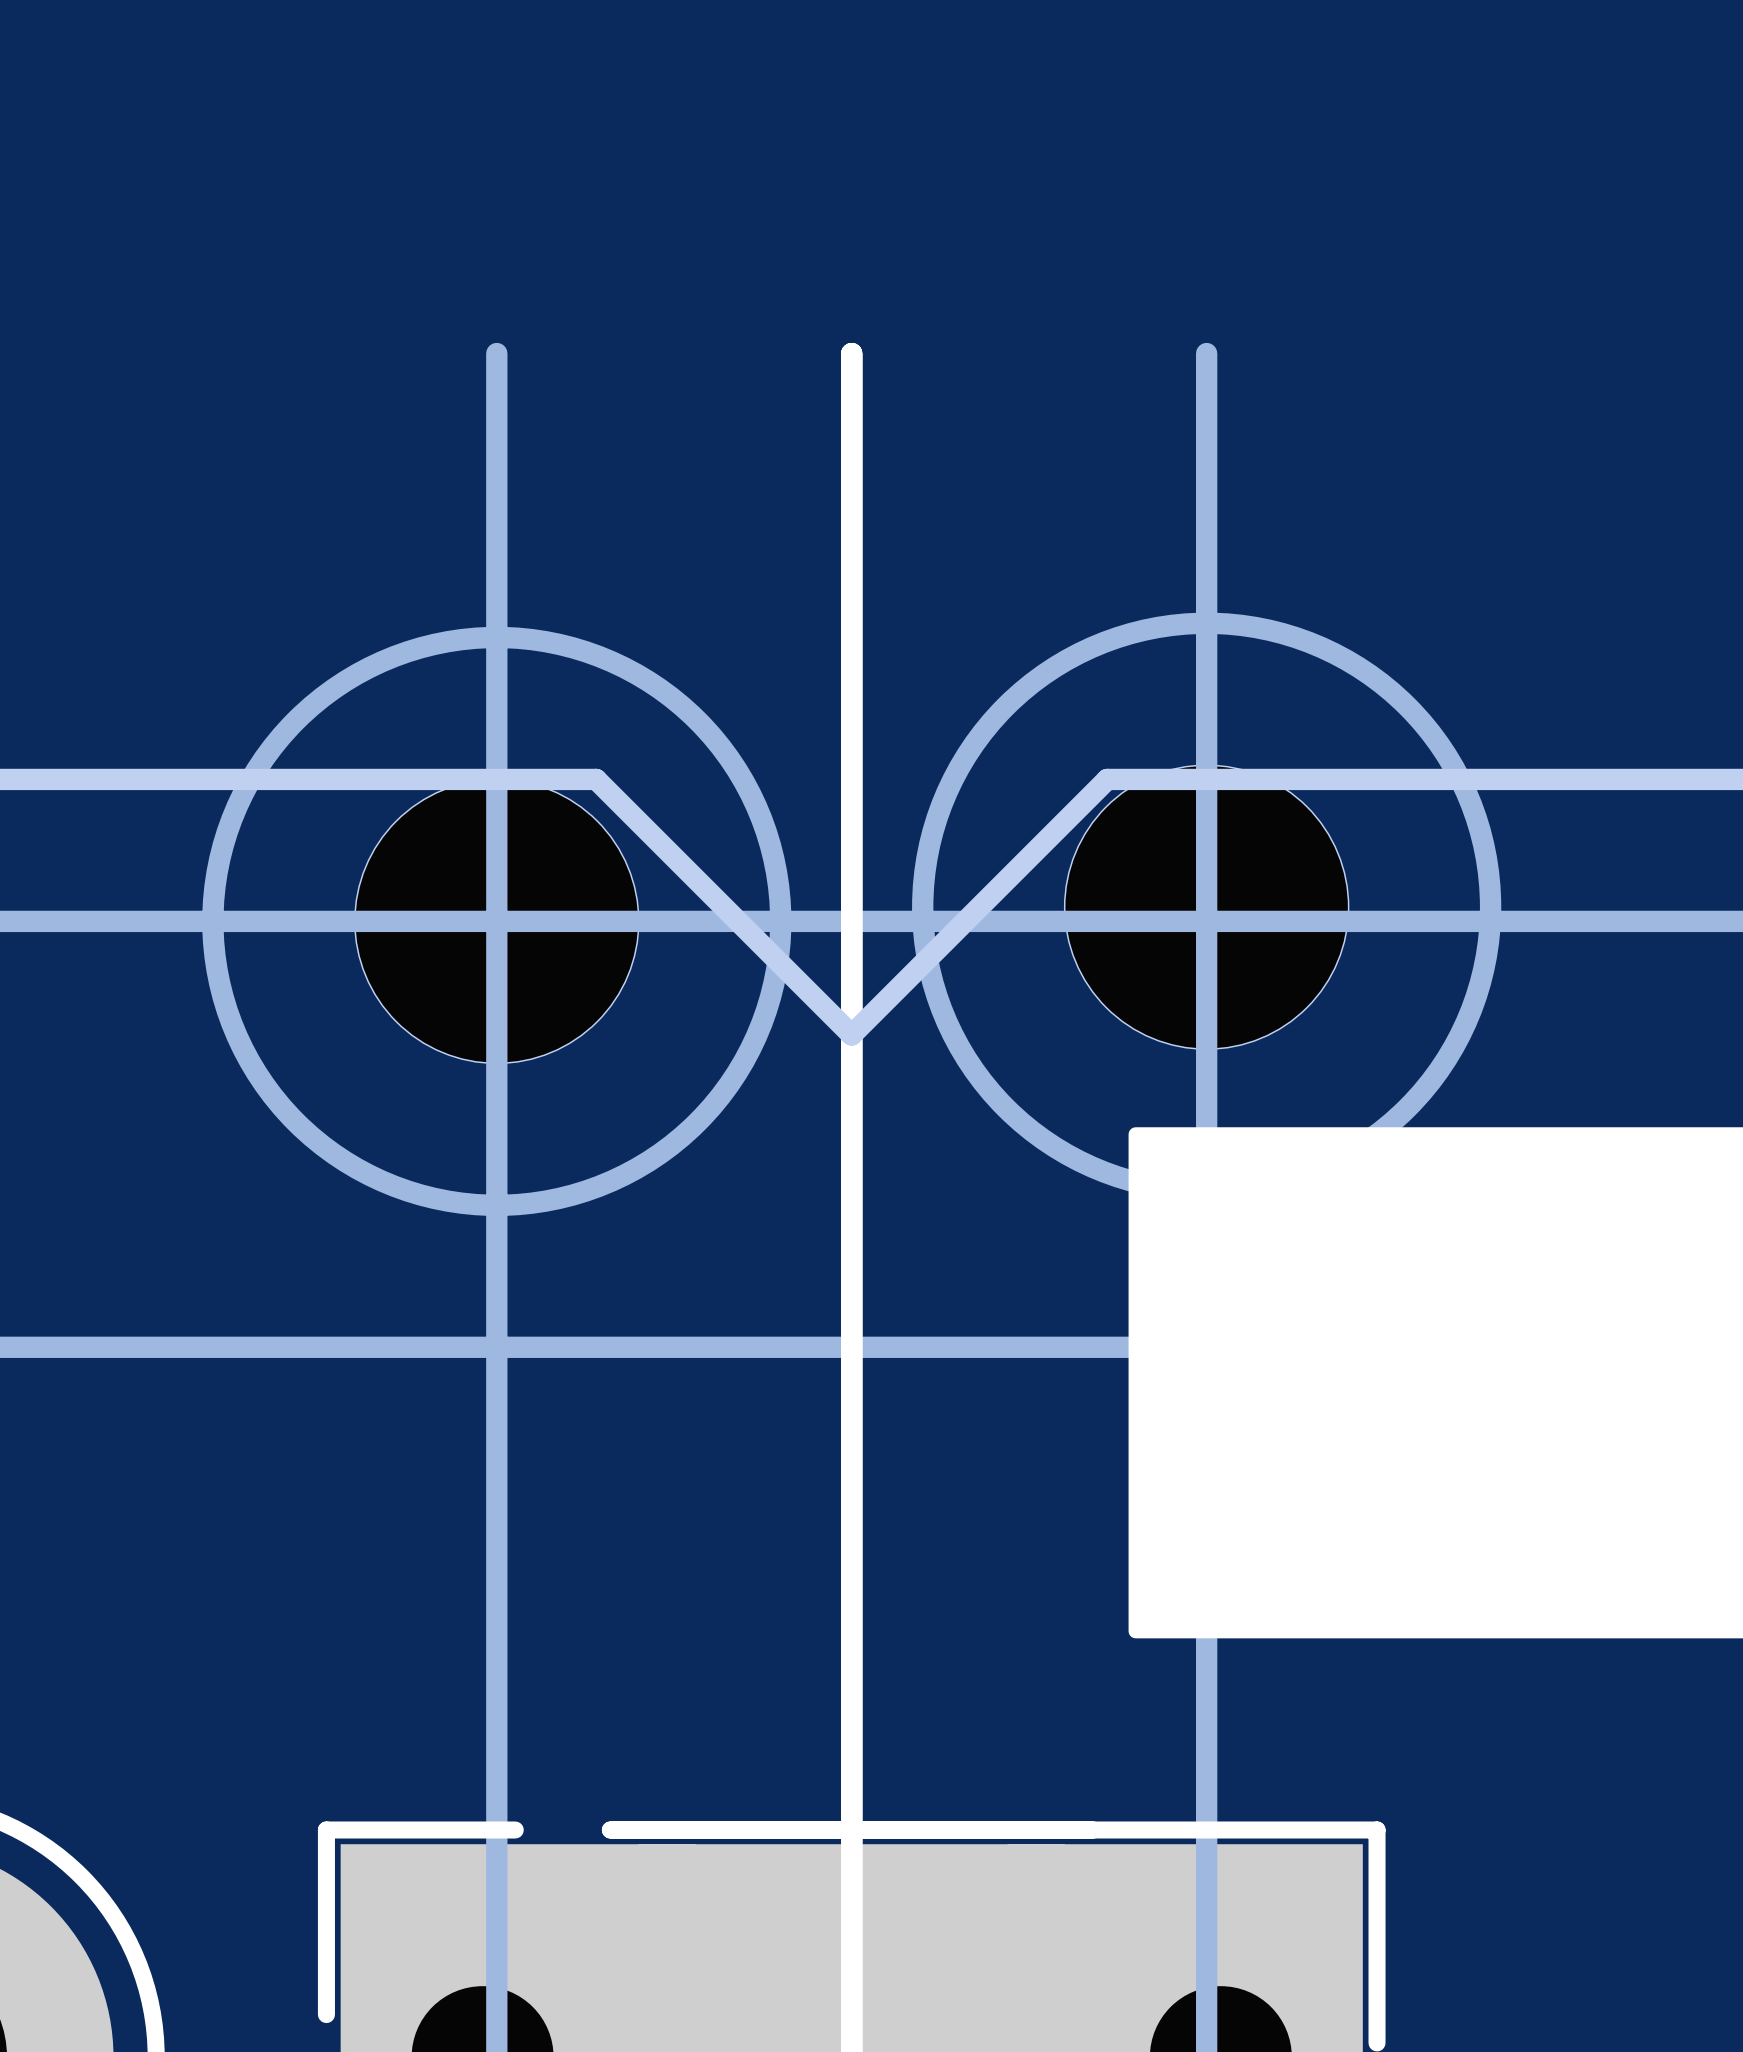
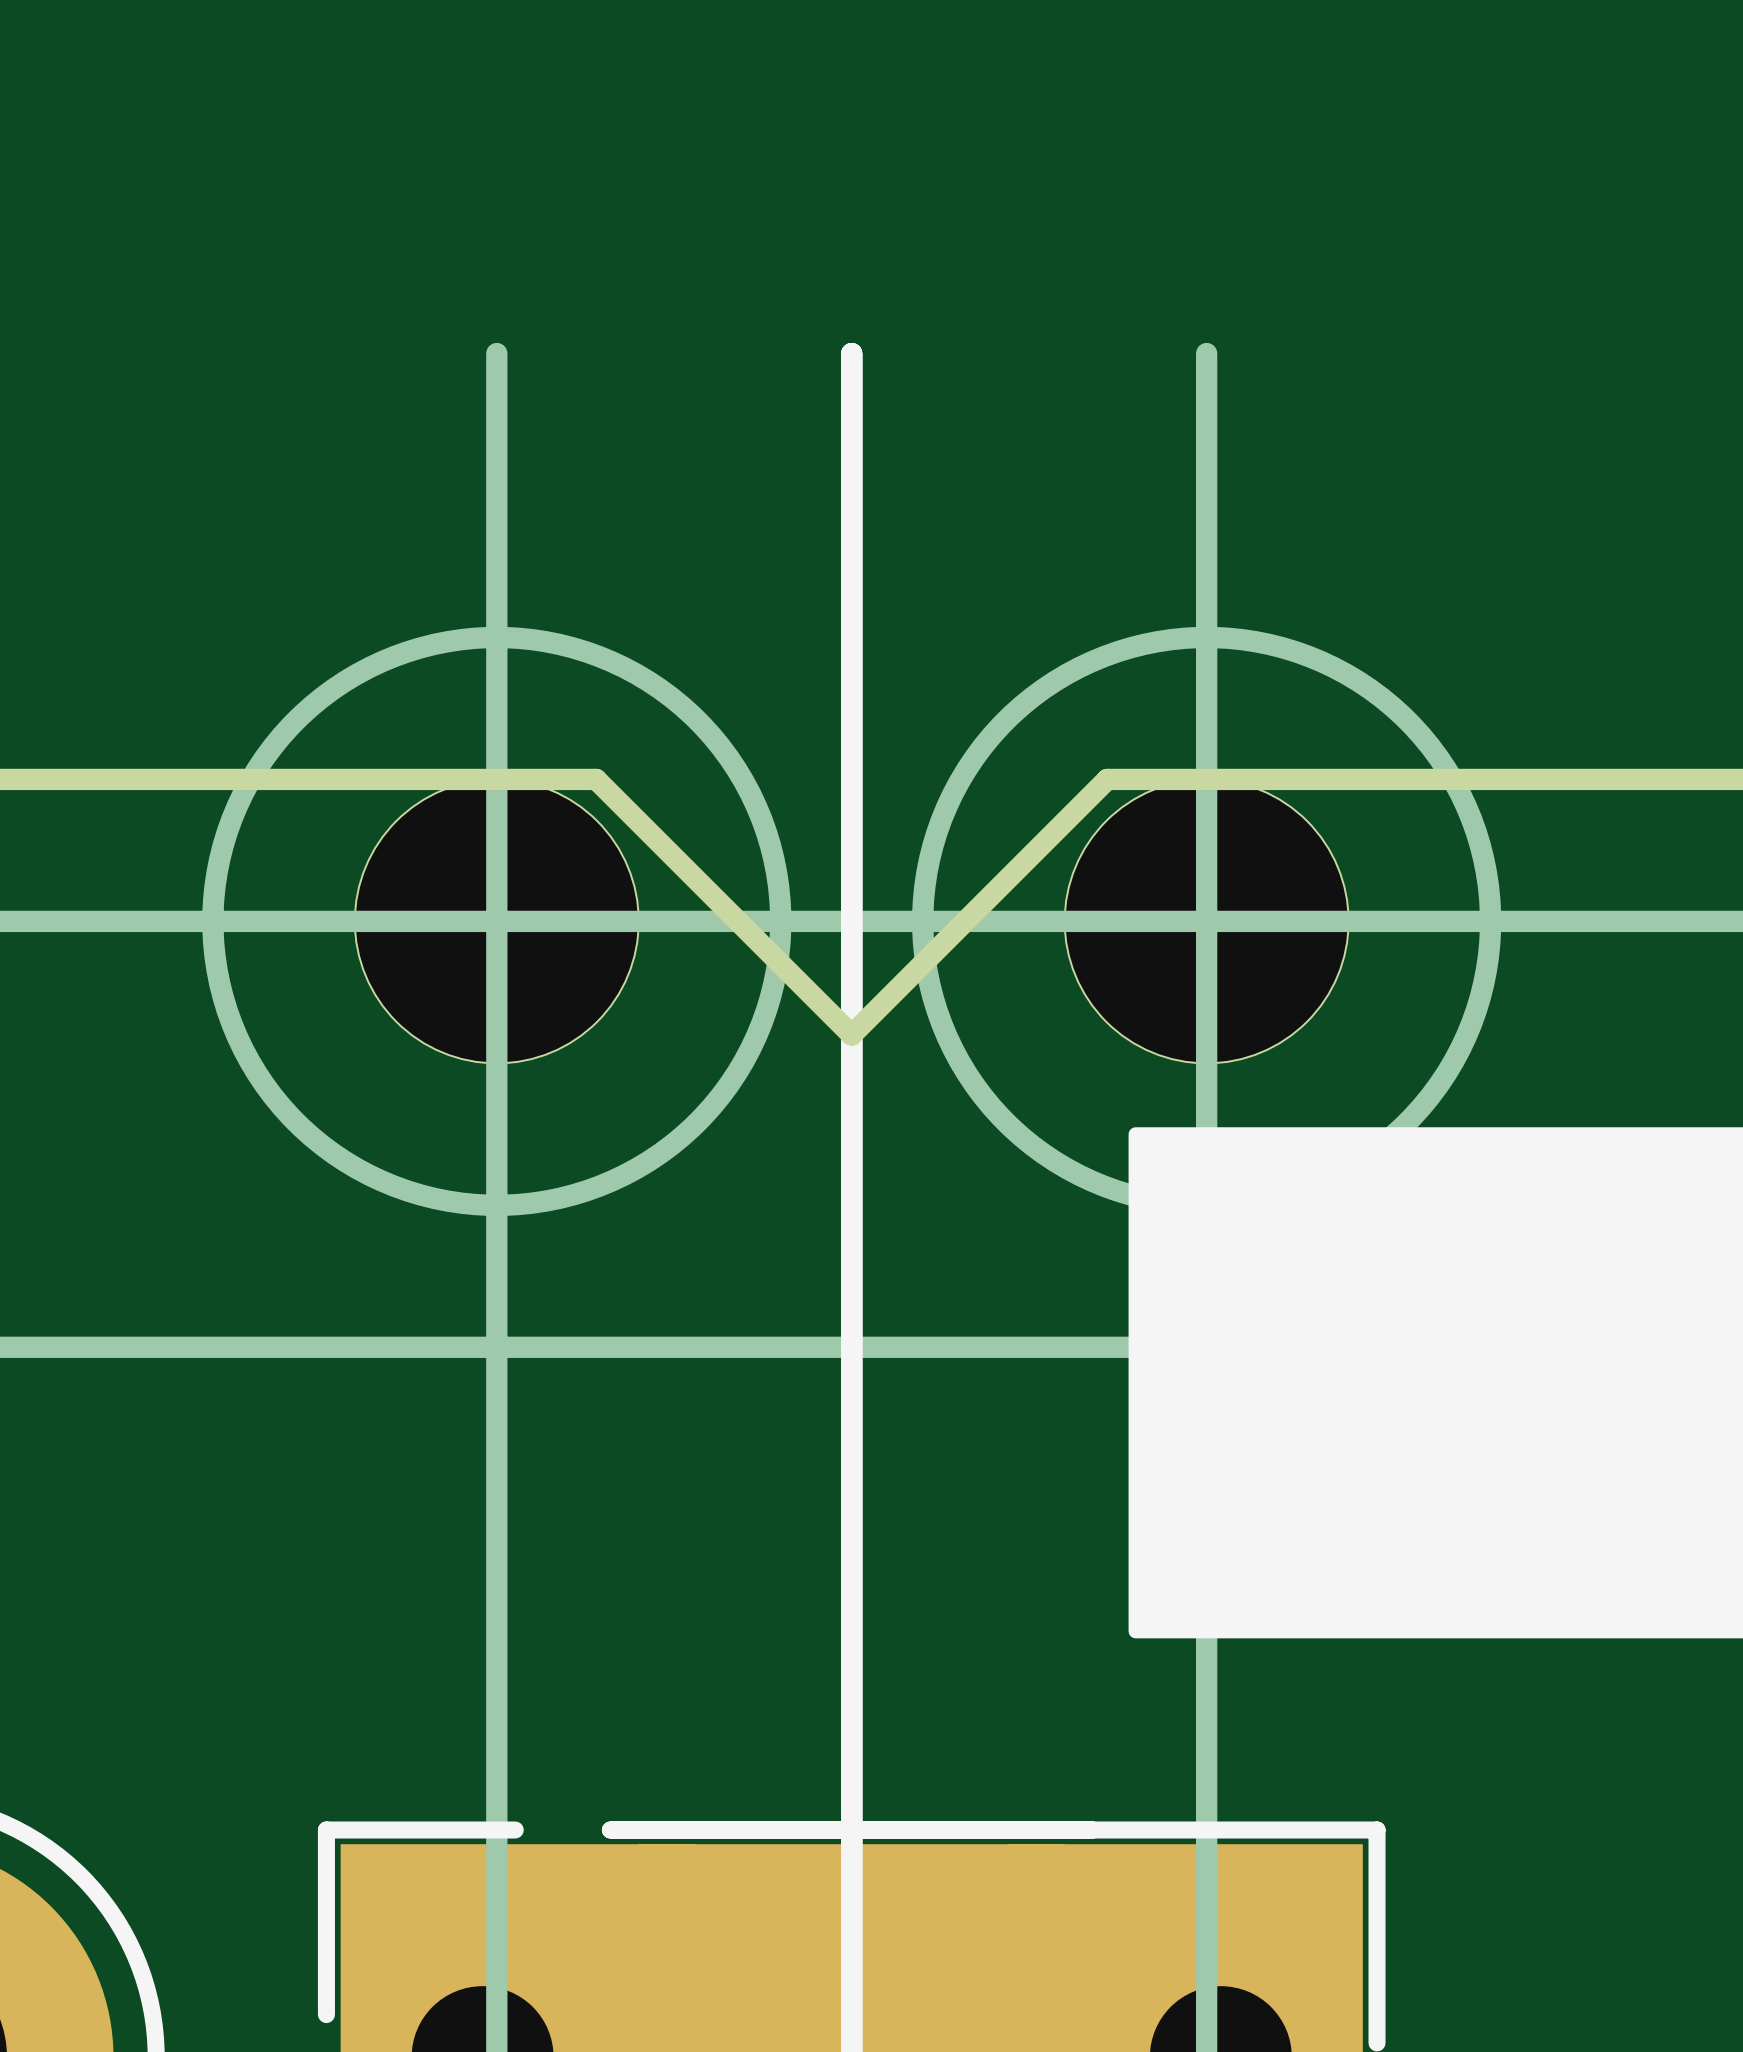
part position: (1206, 907) -> (1206, 921)

